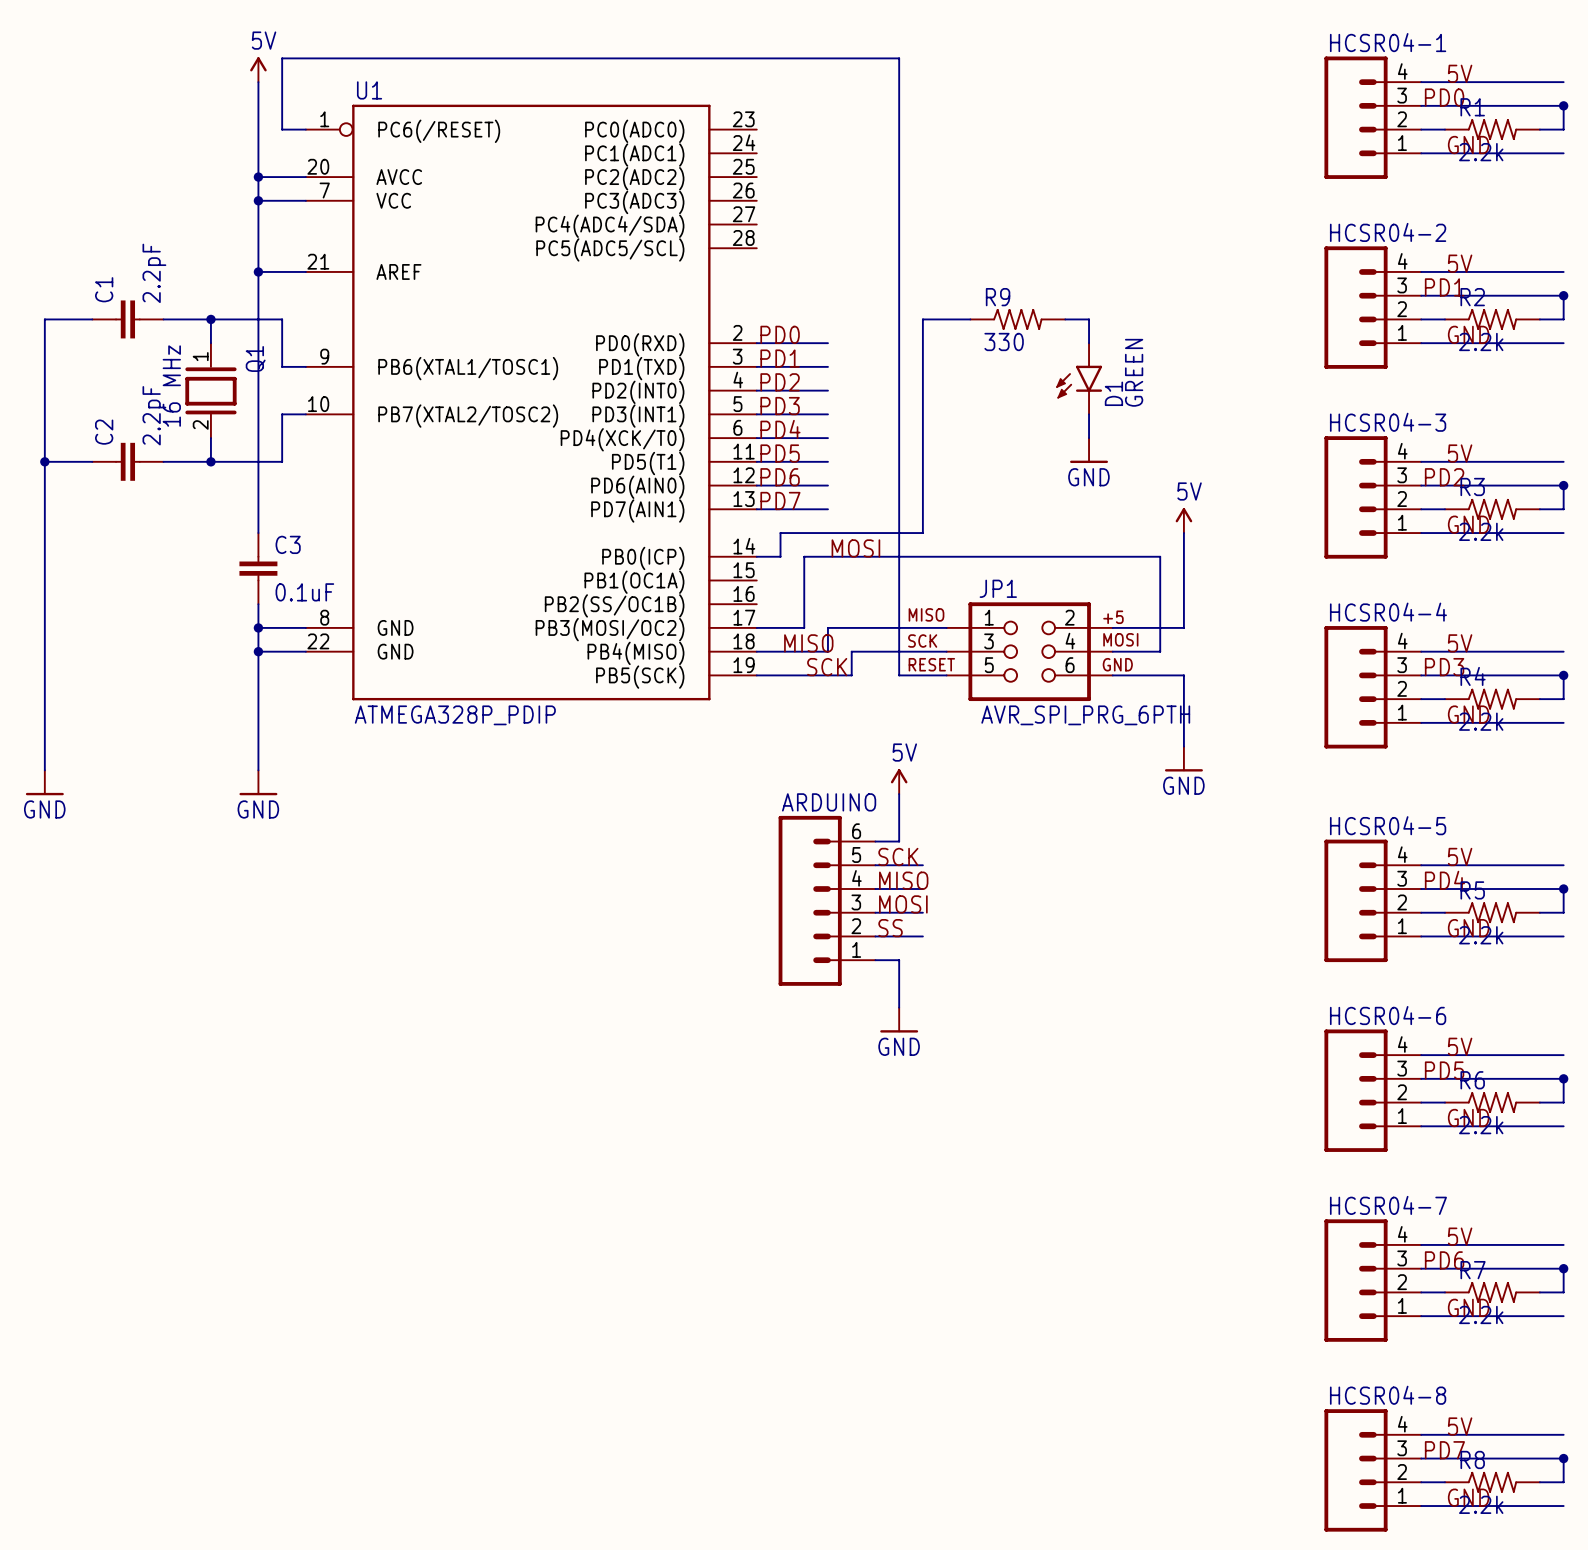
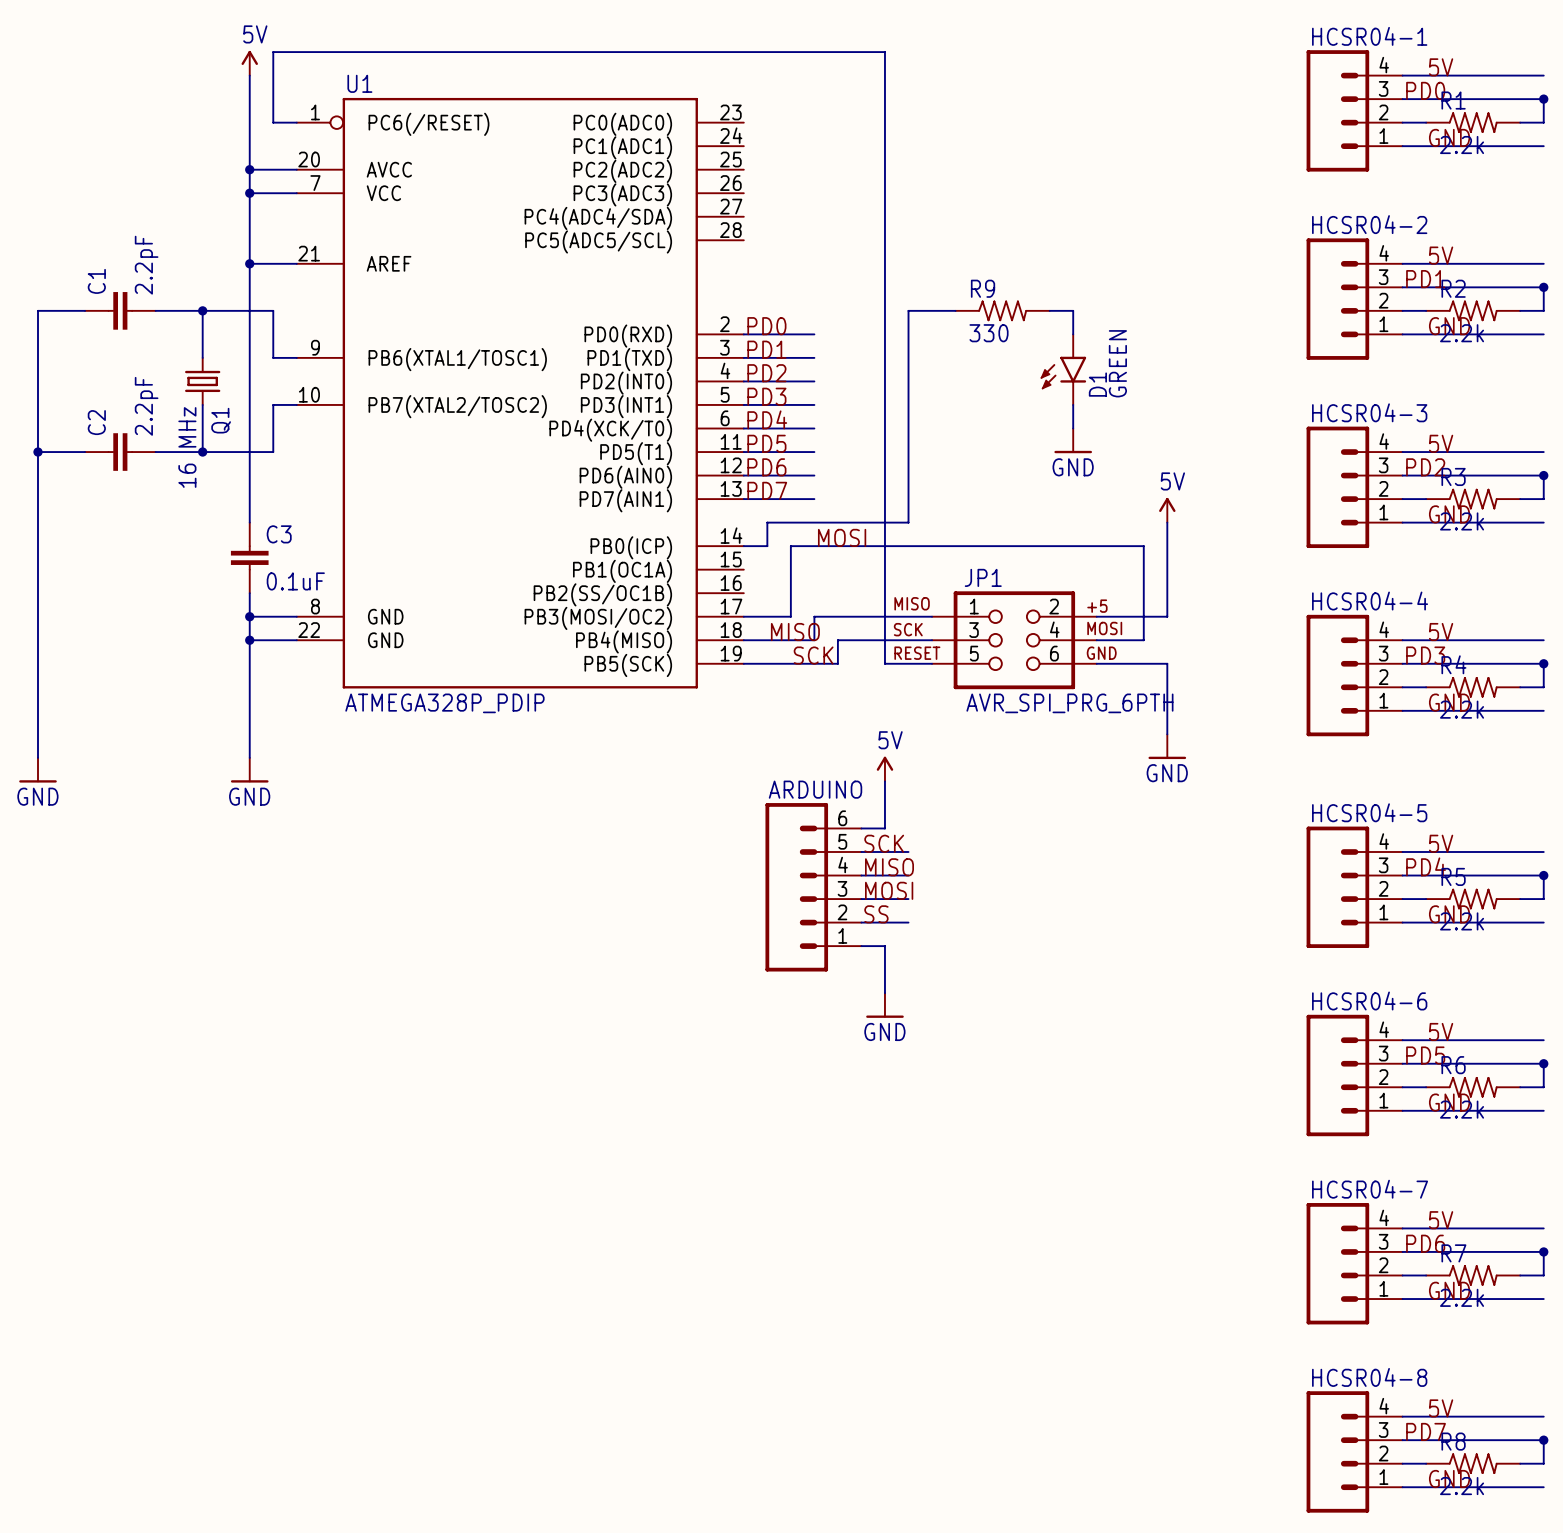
Q1 symbol: [185, 343, 237, 439] -> [185, 357, 221, 406]
Q1 name position: Q1 (255, 359) -> Q1 (221, 420)
Q1 value position: 16 MHz (171, 386) -> 16 MHz (187, 447)

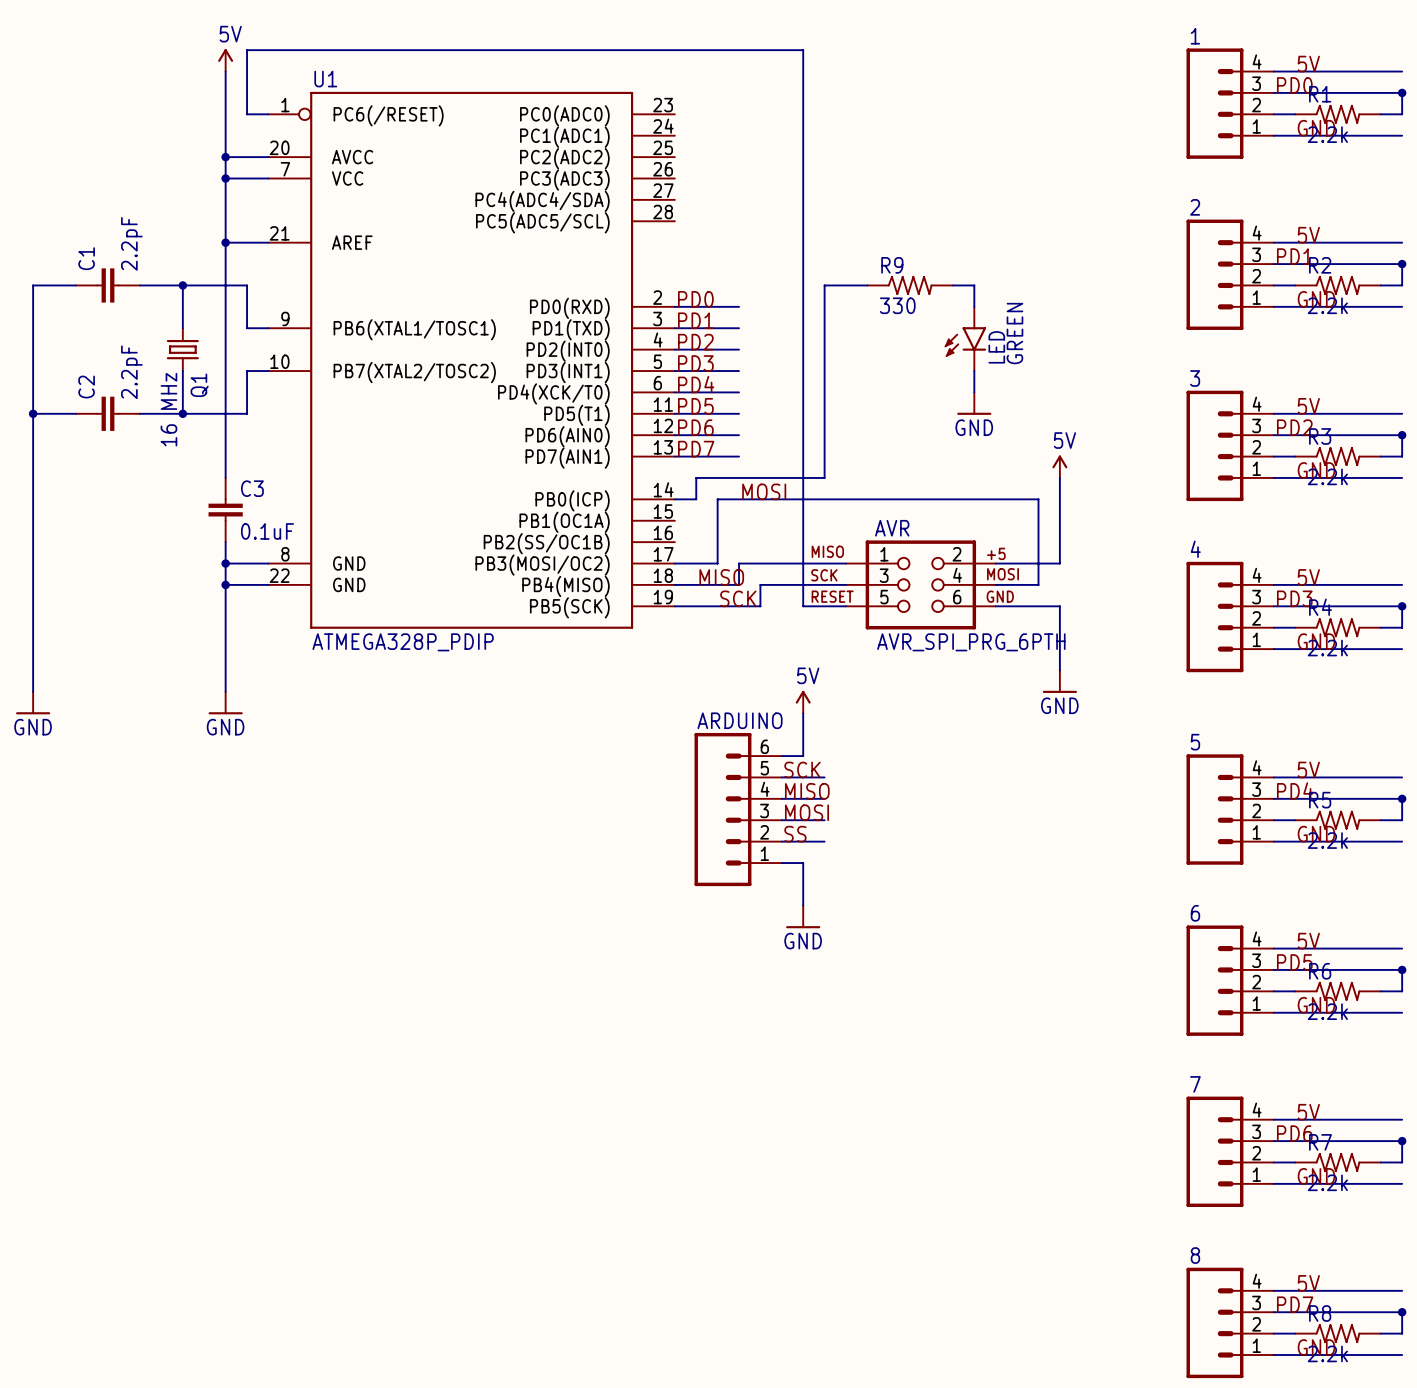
HCSR04-1 name: HCSR04-1 (1369, 36) -> 1 (1195, 36)
HCSR04-2 name: HCSR04-2 (1369, 224) -> 2 (1195, 207)
D1 name: D1 (1097, 384) -> LED (996, 347)
HCSR04-3 name: HCSR04-3 (1369, 412) -> 3 (1195, 378)
JP1 name: JP1 (983, 577) -> AVR (892, 528)
HCSR04-4 name: HCSR04-4 (1370, 601) -> 4 (1195, 549)
HCSR04-5 name: HCSR04-5 (1369, 812) -> 5 (1195, 742)
HCSR04-6 name: HCSR04-6 (1369, 1001) -> 6 (1195, 913)
HCSR04-7 name: HCSR04-7 (1370, 1189) -> 7 (1195, 1084)
HCSR04-8 name: HCSR04-8 (1369, 1377) -> 8 (1195, 1255)

